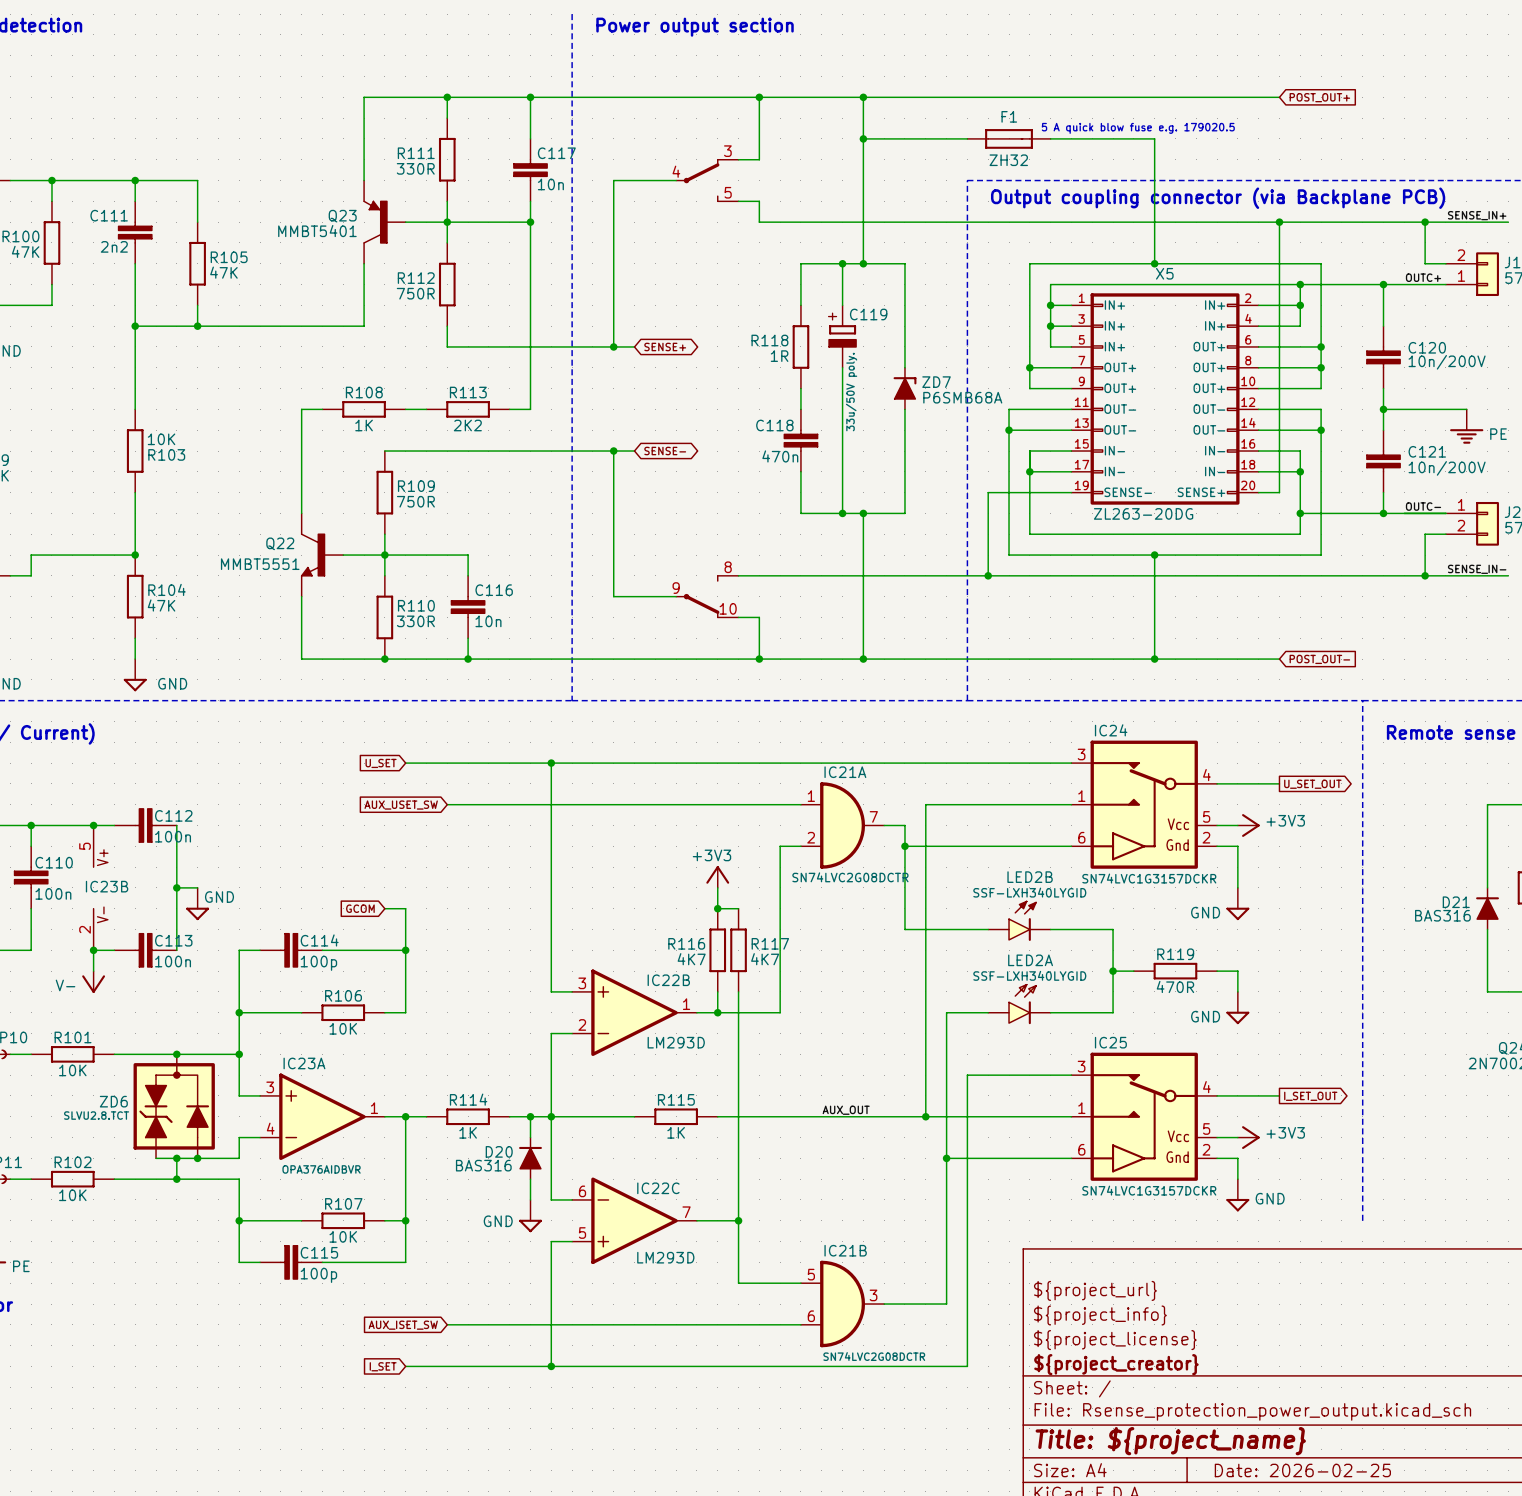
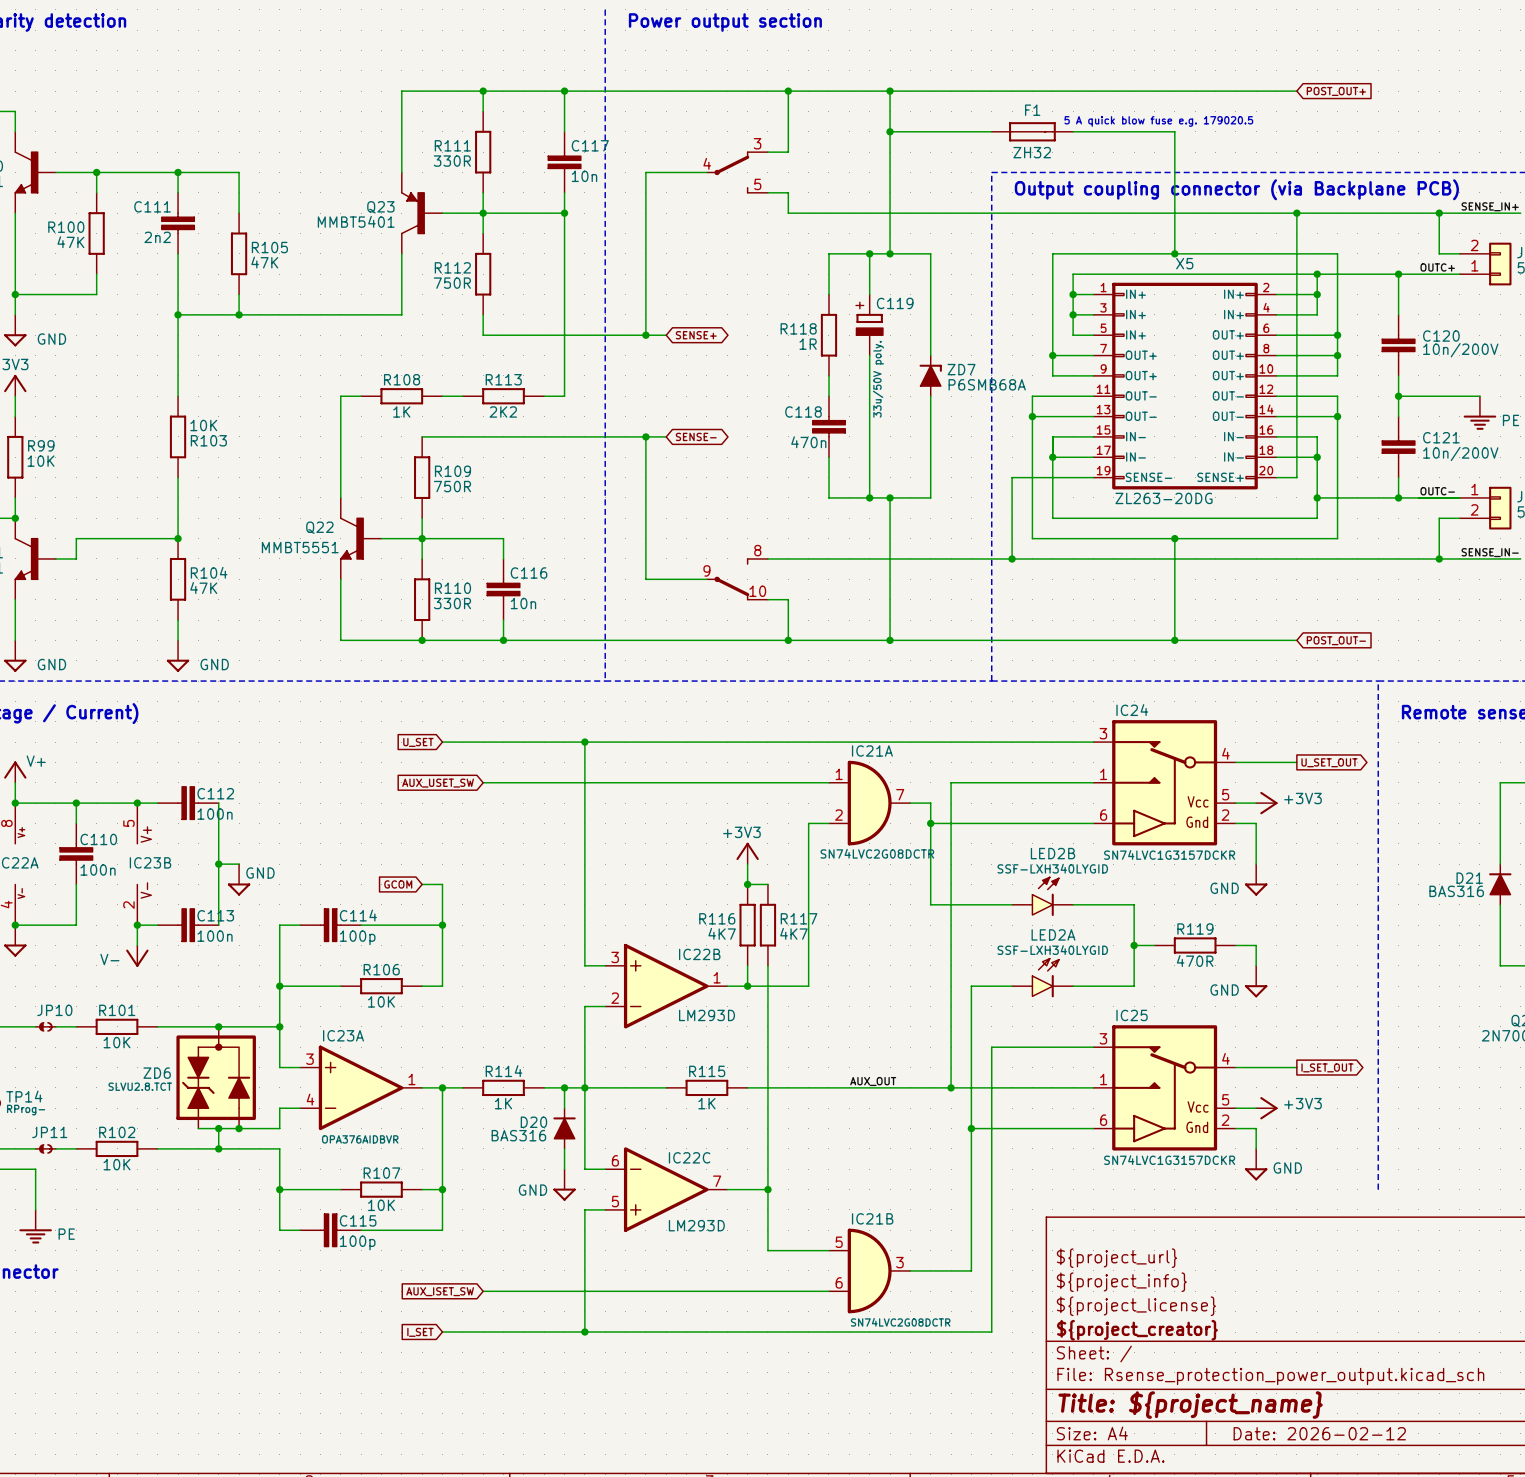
title block: Date: 2026-02-25 (1302, 1470) -> Date: 2026-02-12 (1319, 1433)

